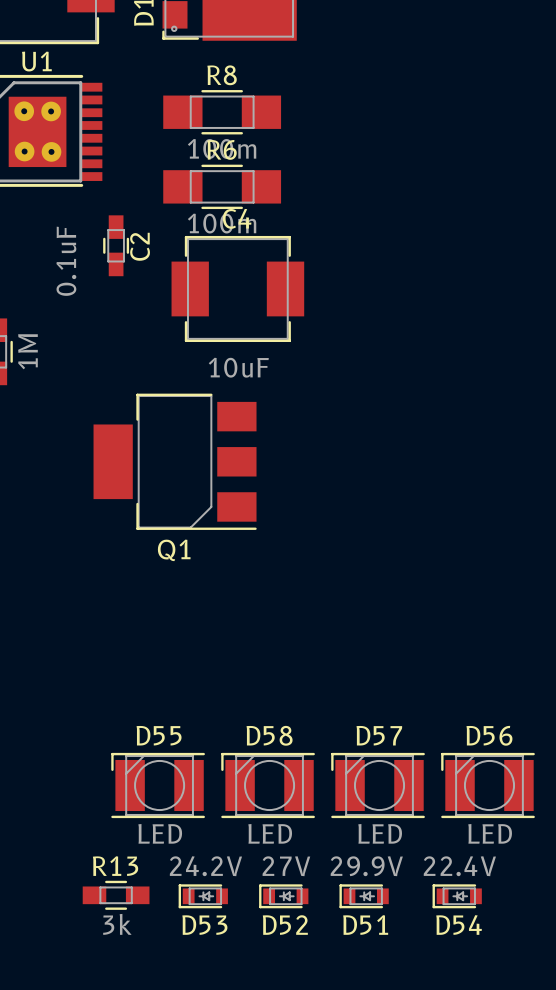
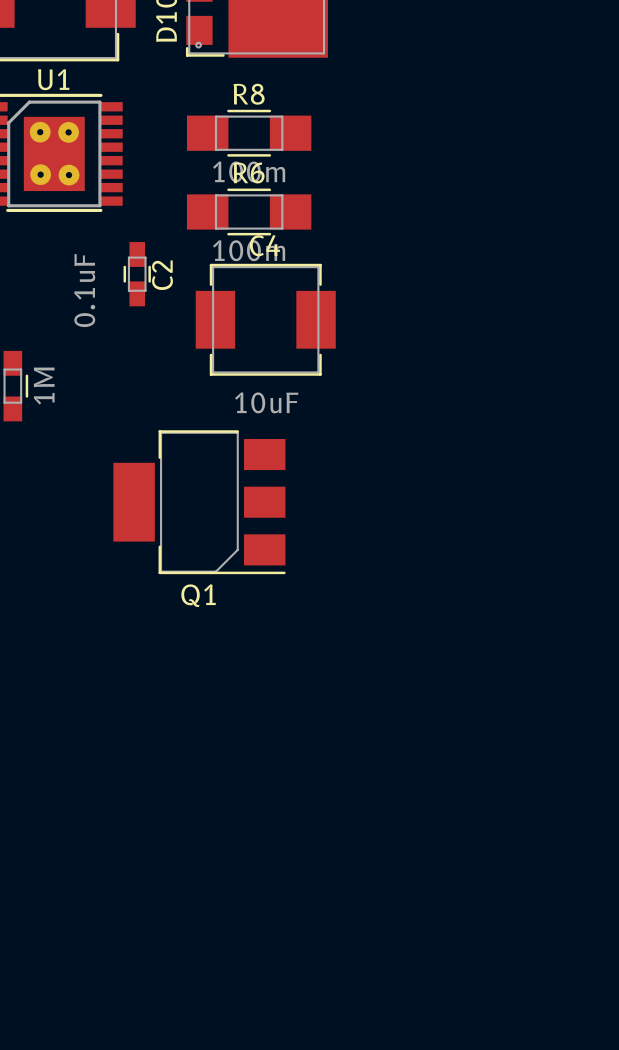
D55: LED (158, 785) -> none
D58: LED (268, 785) -> none
D57: LED (378, 785) -> none
D56: LED (488, 785) -> none
R13: 3k (116, 895) -> none
D53: 24.2V (203, 896) -> none
D52: 27V (283, 896) -> none
D51: 29.9V (364, 896) -> none
D54: 22.4V (457, 896) -> none

